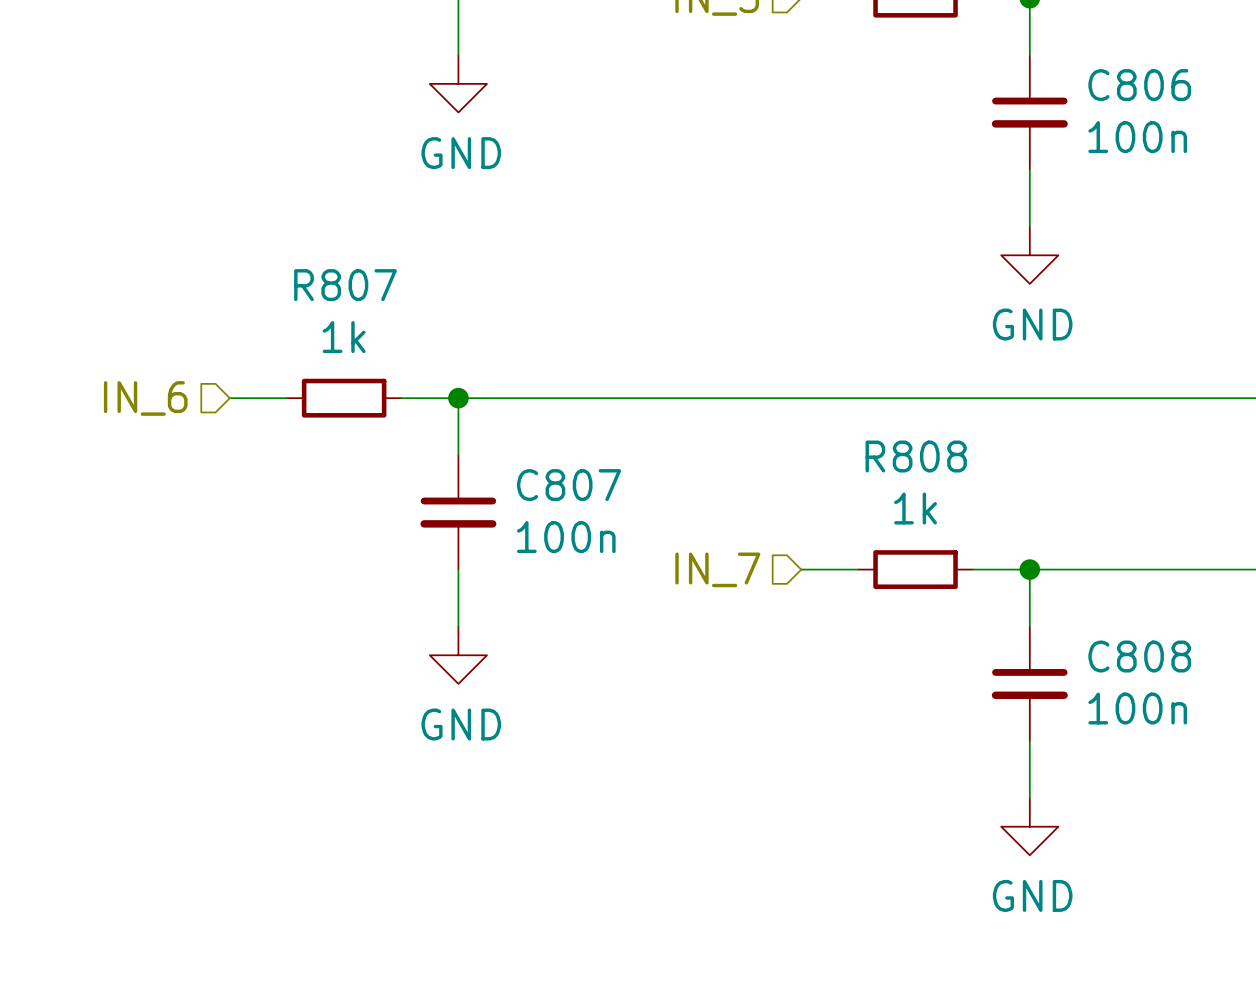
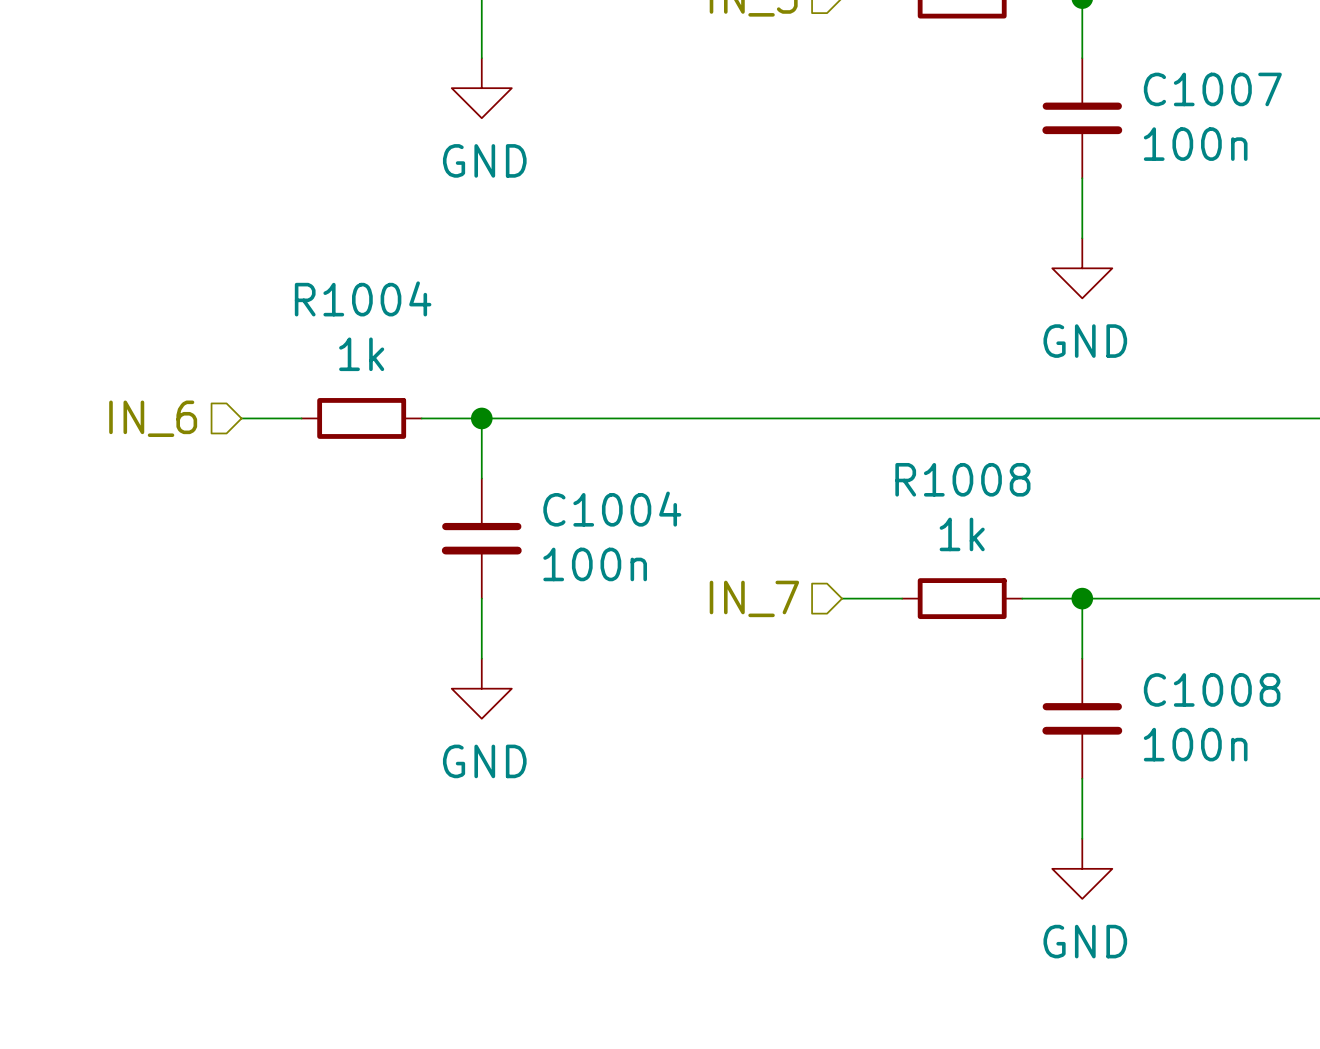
C806 name: C806 (1139, 85) -> C1007 (1212, 89)
R807 name: R807 (345, 285) -> R1004 (363, 298)
R808 name: R808 (916, 456) -> R1008 (962, 479)
C807 name: C807 (569, 485) -> C1004 (612, 509)
C808 name: C808 (1139, 656) -> C1008 (1212, 689)

